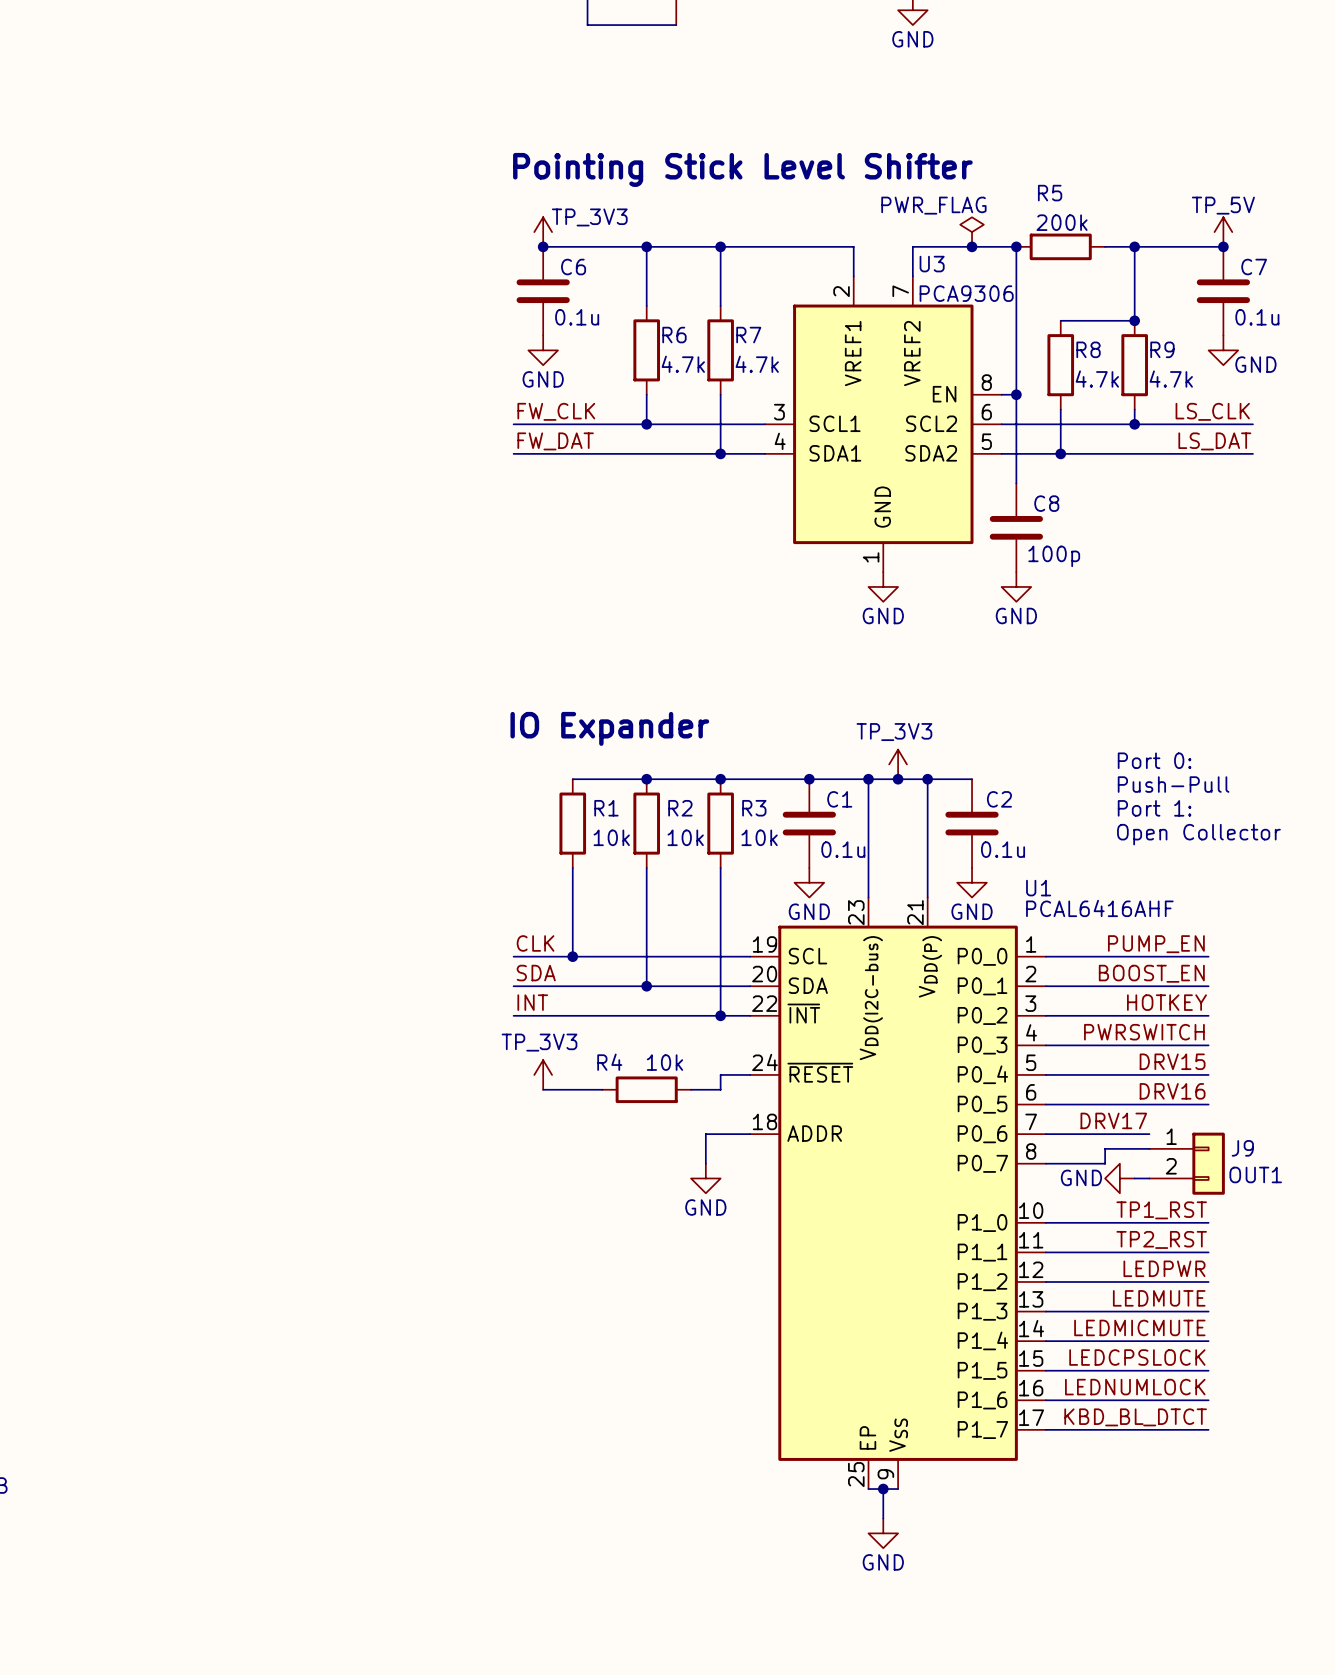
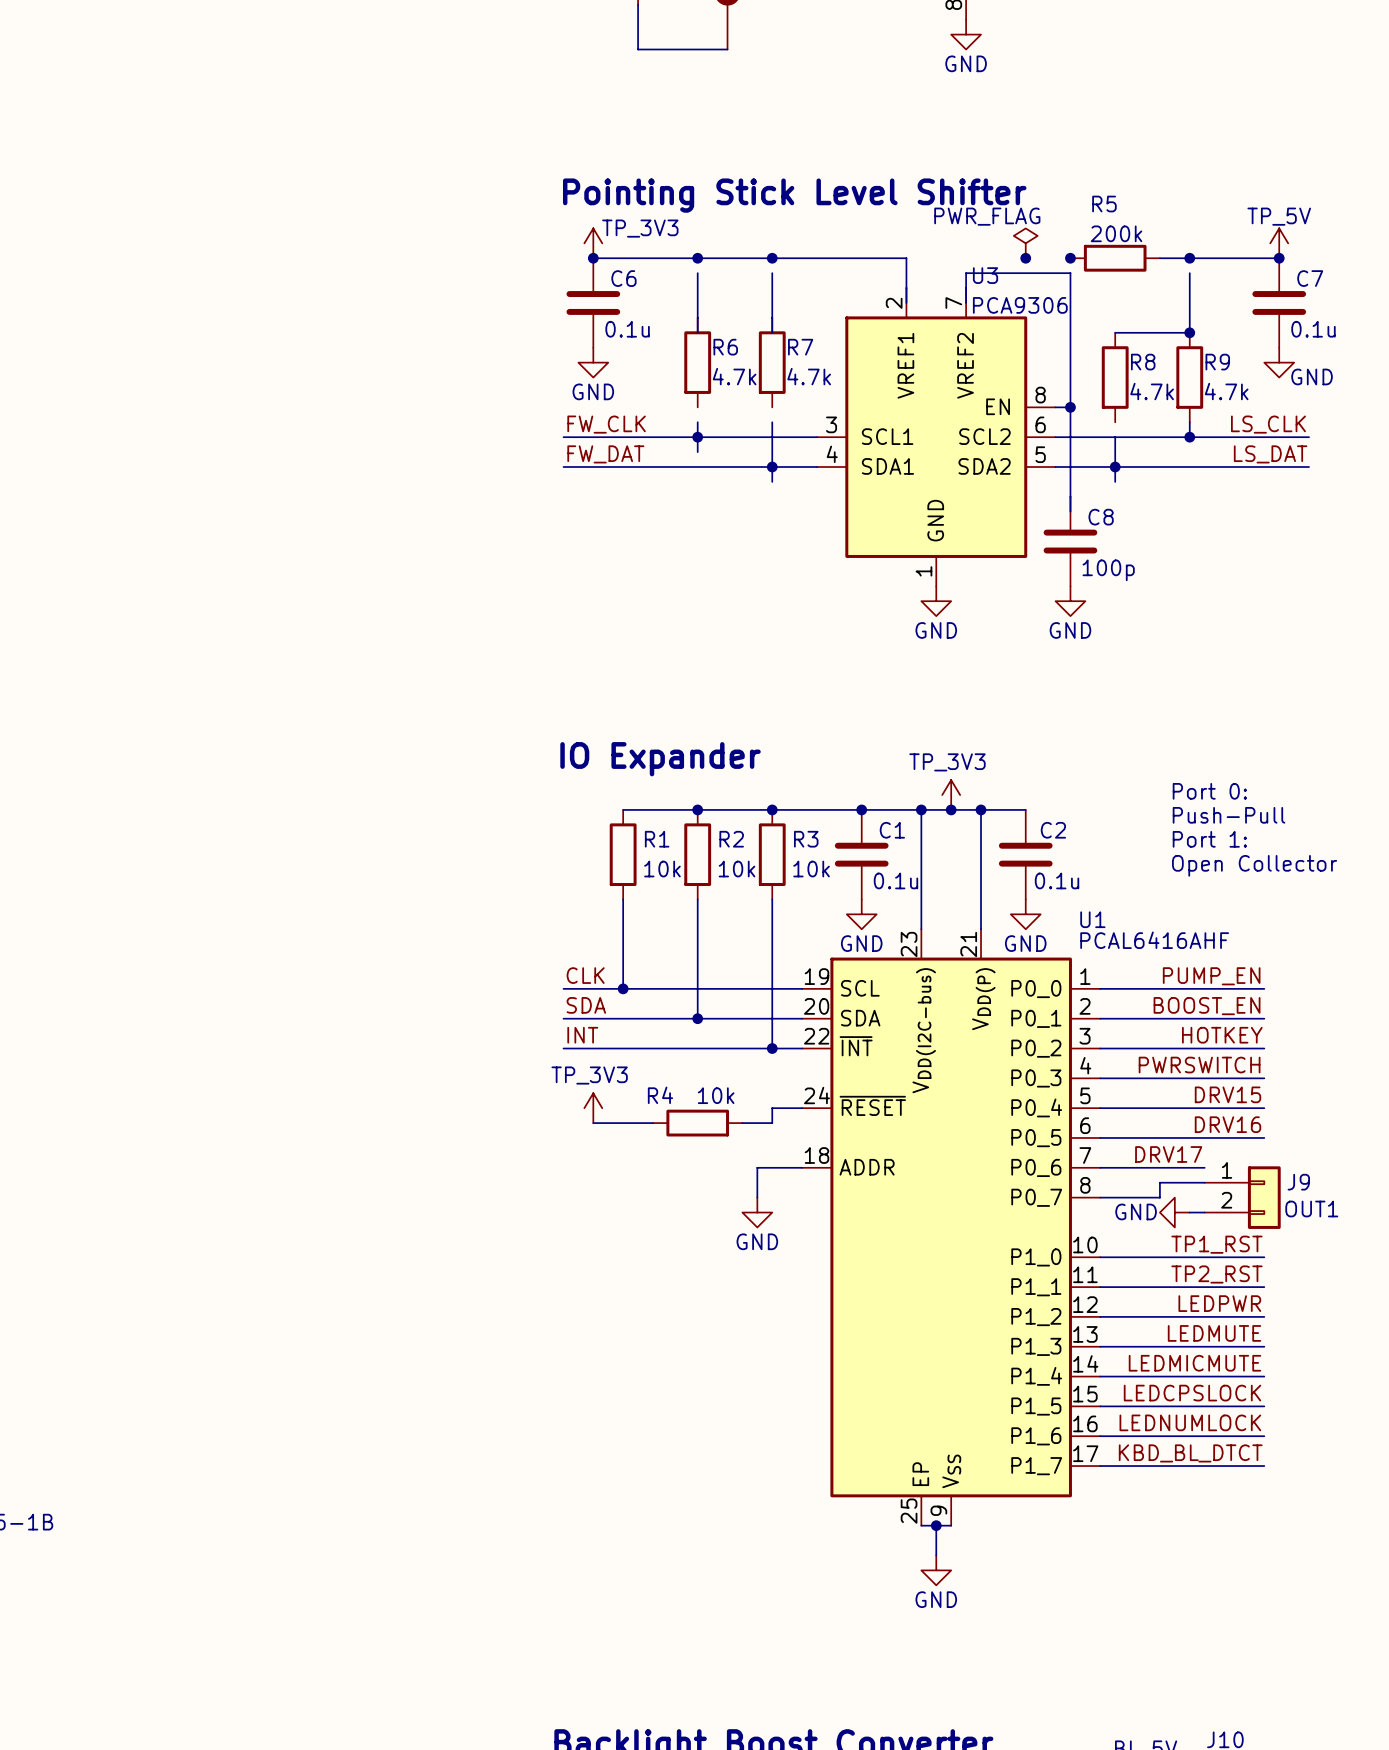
power symbol position: TP_3V3 (543, 232) -> TP_3V3 (593, 243)
power symbol position: PWR_FLAG (972, 232) -> PWR_FLAG (1025, 243)
power symbol position: TP_5V (1223, 232) -> TP_5V (1279, 243)
wire: (543, 246) (853, 246) -> (593, 258) (906, 258) (906, 273)
junction position: (543, 246) -> (593, 258)
junction position: (646, 246) -> (697, 258)
junction position: (720, 246) -> (772, 258)
junction position: (972, 246) -> (1025, 258)
junction position: (1016, 246) -> (1070, 258)
R5 position: (1060, 246) -> (1115, 258)
wire: (1105, 246) (1223, 246) -> (1159, 258) (1279, 258)
junction position: (1134, 246) -> (1189, 258)
junction position: (1223, 246) -> (1279, 258)
C6 position: (543, 291) -> (593, 302)
C7 position: (1223, 291) -> (1279, 302)
wire: (1134, 306) (1134, 320) (1060, 320) -> (1189, 332) (1115, 332)
junction position: (1134, 320) -> (1189, 332)
power symbol position: GND (543, 350) -> GND (593, 362)
R6 position: (646, 350) -> (697, 362)
R7 position: (720, 350) -> (772, 362)
power symbol position: GND (1223, 350) -> GND (1279, 362)
R8 position: (1060, 365) -> (1115, 377)
R9 position: (1134, 365) -> (1189, 377)
wire: (1001, 394) (1016, 394) -> (1055, 407) (1070, 407)
junction position: (1016, 394) -> (1070, 407)
label position: FW_CLK (556, 411) -> FW_CLK (606, 424)
label position: LS_CLK (1212, 411) -> LS_CLK (1268, 424)
wire: (513, 424) (764, 424) -> (563, 437) (816, 437)
junction position: (646, 424) -> (697, 437)
U3 position: (883, 424) -> (936, 437)
wire: (1001, 424) (1252, 424) -> (1055, 437) (1309, 437)
junction position: (1134, 424) -> (1189, 437)
label position: FW_DAT (555, 441) -> FW_DAT (605, 454)
label position: LS_DAT (1214, 441) -> LS_DAT (1270, 454)
wire: (513, 453) (764, 453) -> (563, 467) (816, 467)
junction position: (720, 453) -> (772, 467)
wire: (1001, 453) (1252, 453) -> (1055, 467) (1309, 467)
junction position: (1060, 453) -> (1115, 467)
C8 position: (1016, 527) -> (1070, 541)
power symbol position: GND (883, 586) -> GND (936, 601)
power symbol position: GND (1016, 586) -> GND (1070, 601)

